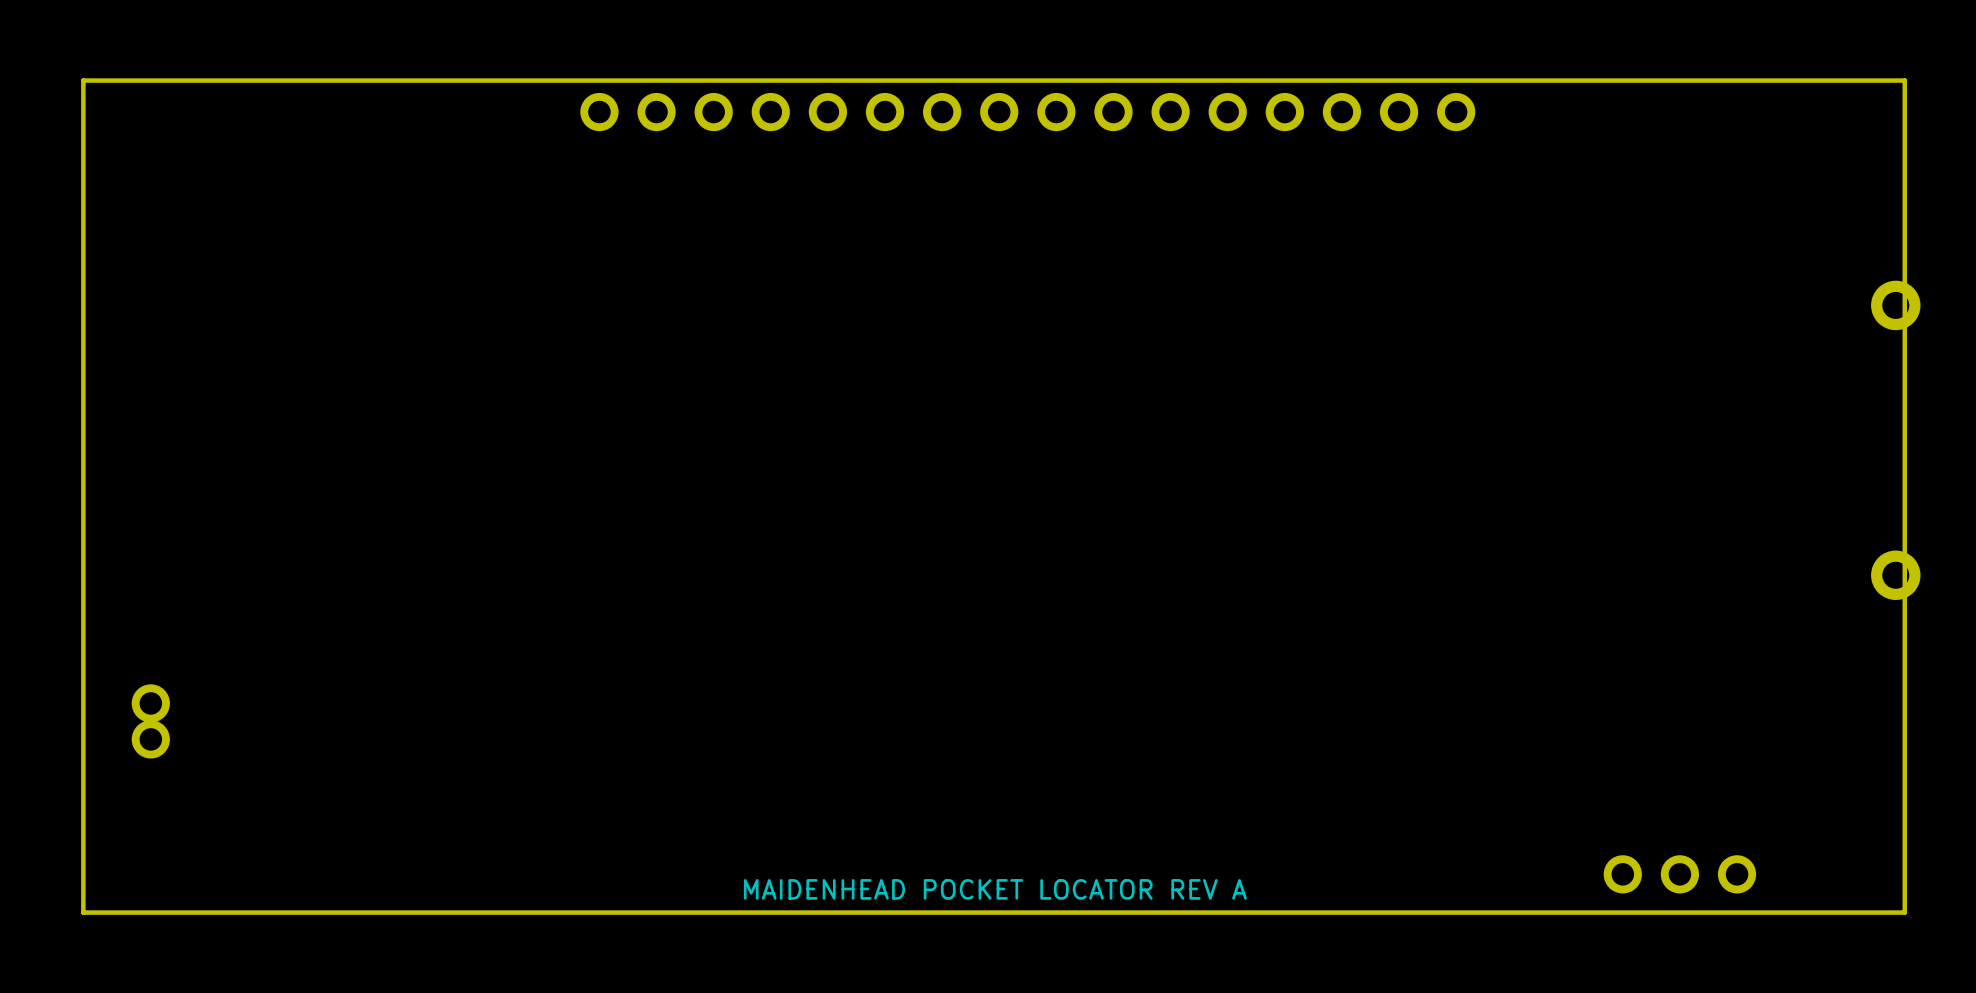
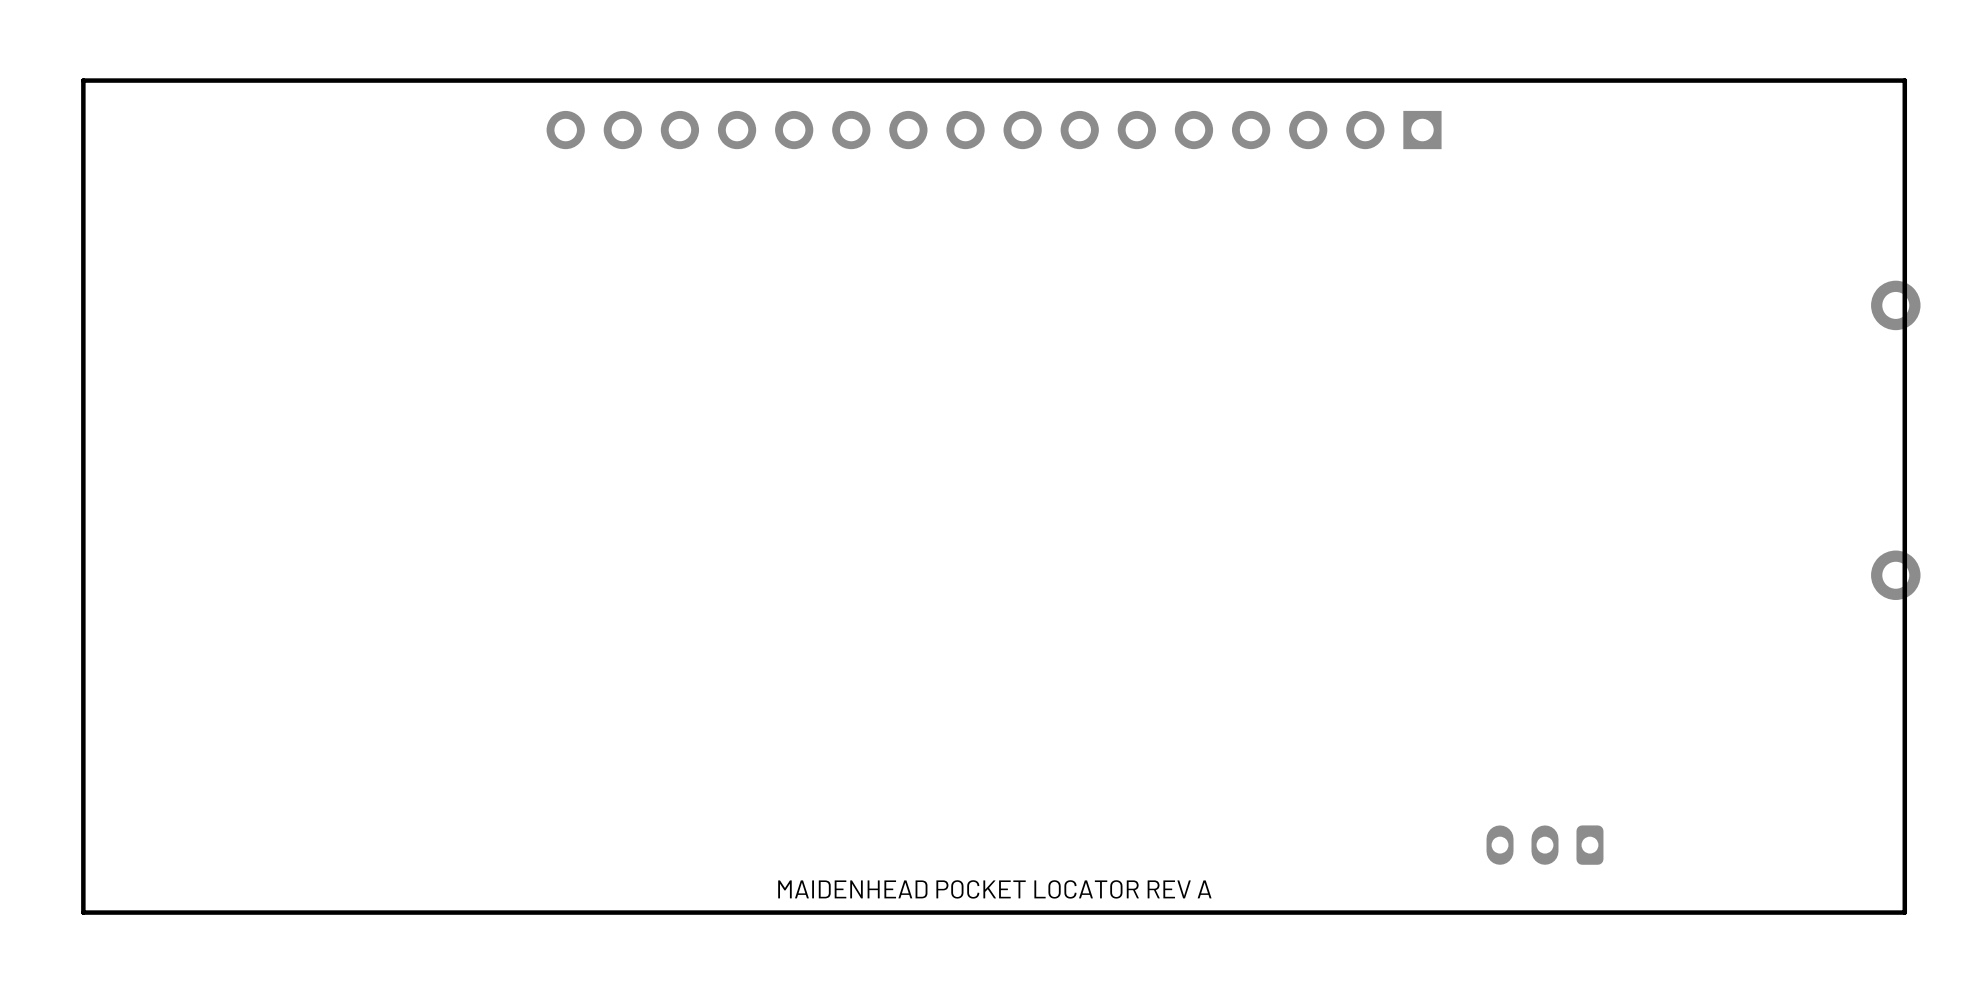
part: (1027, 112) -> none
part: none -> (994, 130)
part: (150, 721) -> none
part: none -> (1544, 845)
part: (1679, 874) -> none

